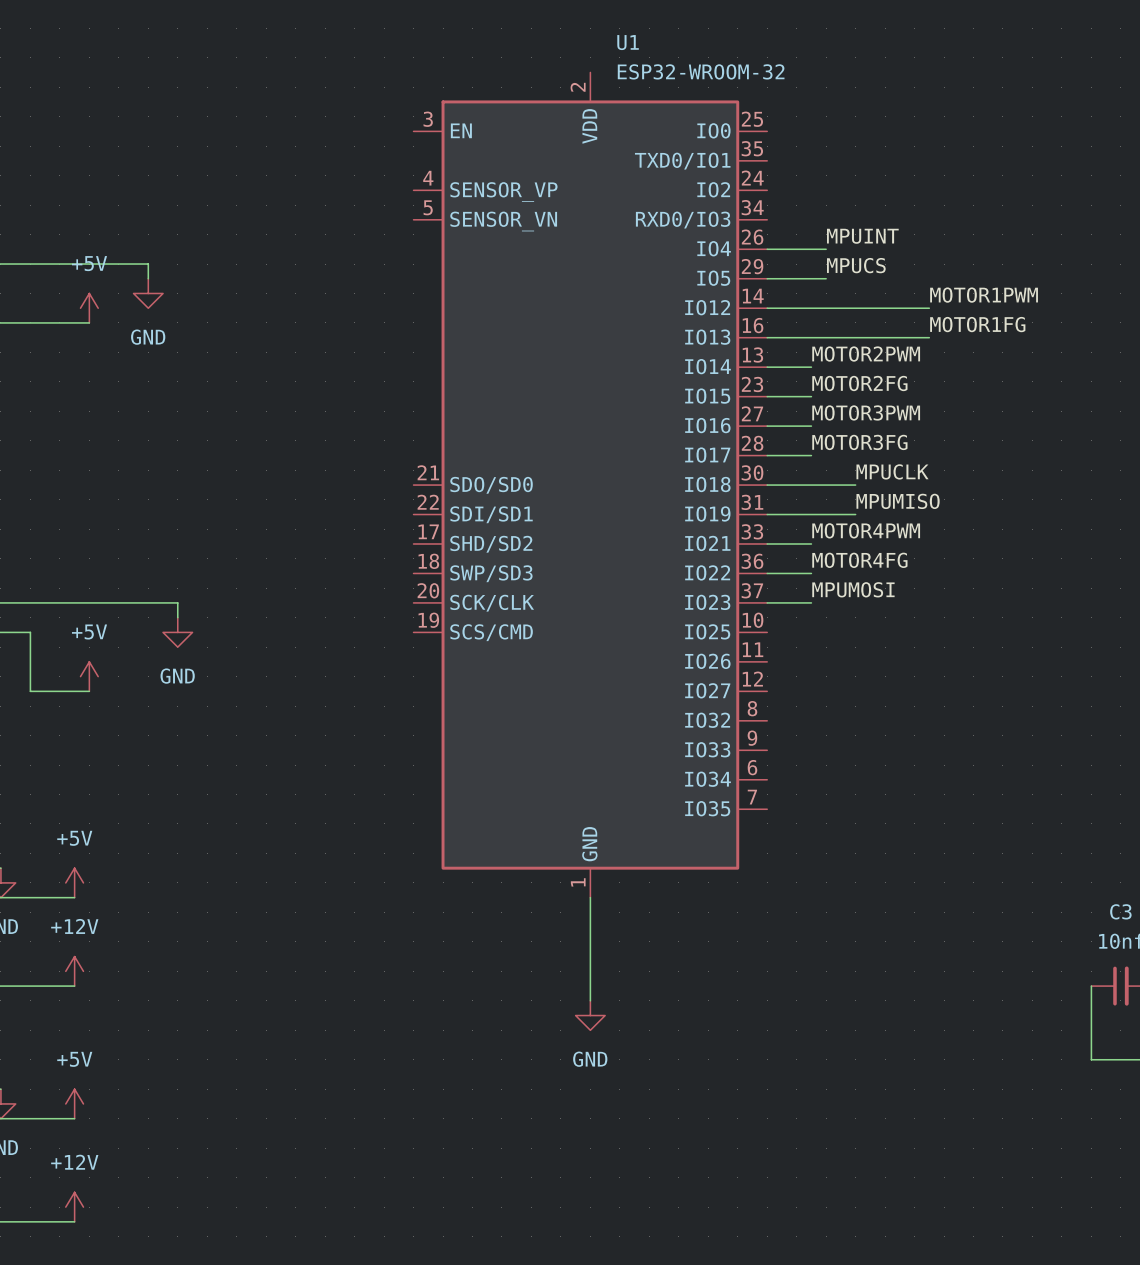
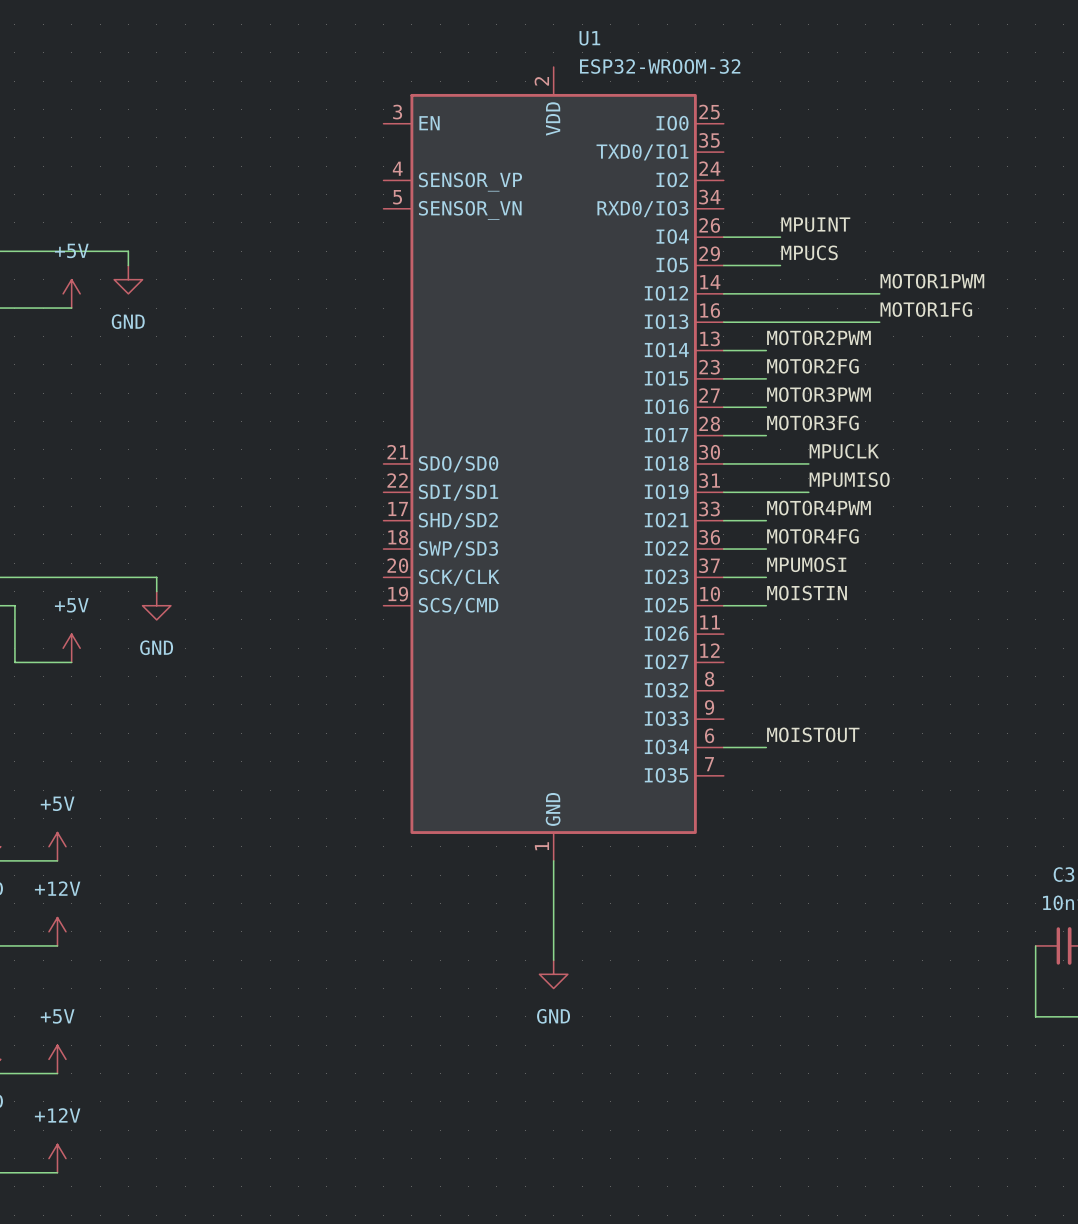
label: none -> MOISTIN (807, 593)
wire: none -> (723, 605) (766, 605)
label: none -> MOISTOUT (813, 734)
wire: none -> (723, 747) (766, 747)

